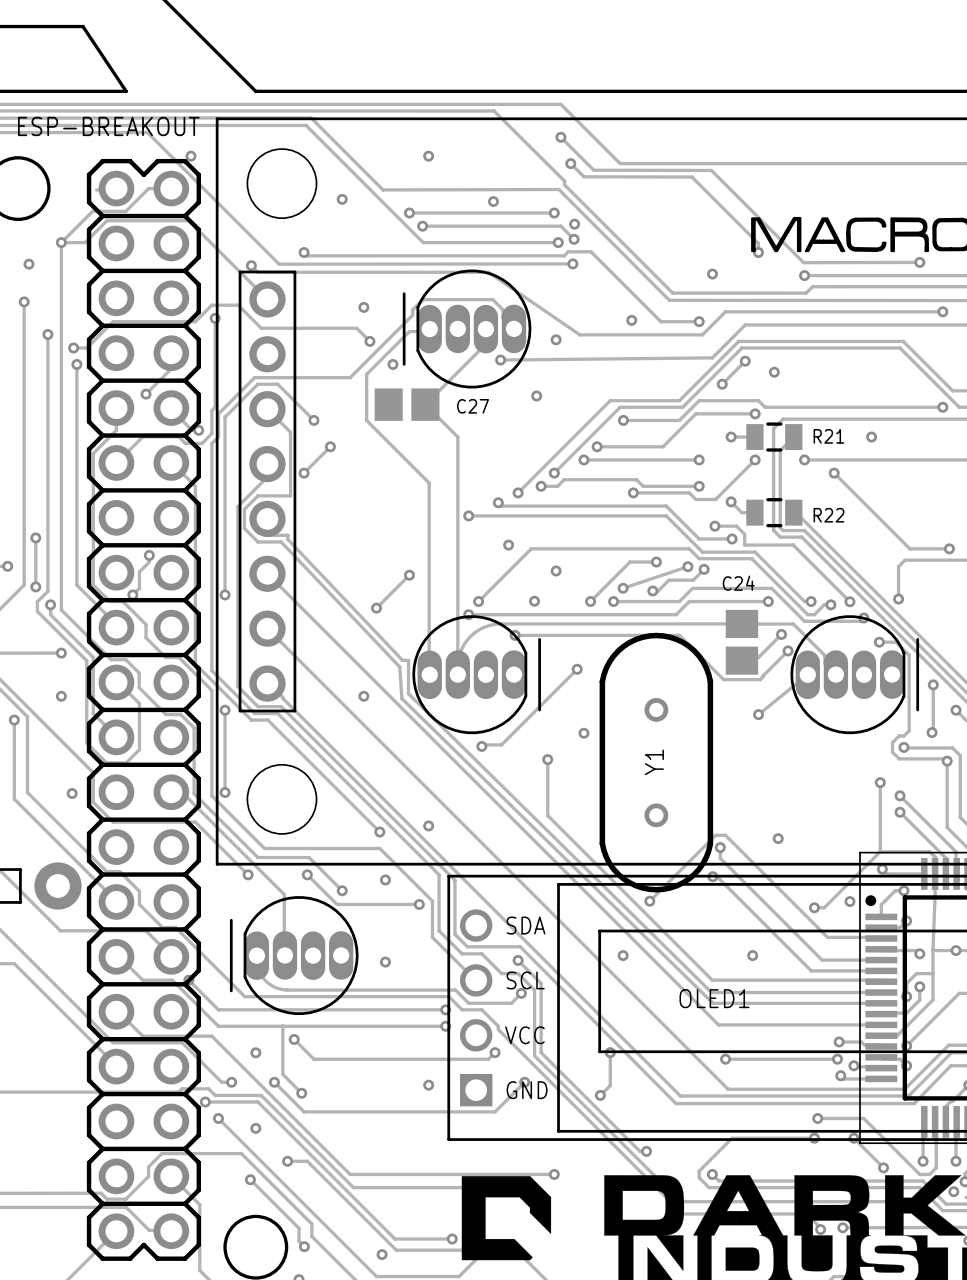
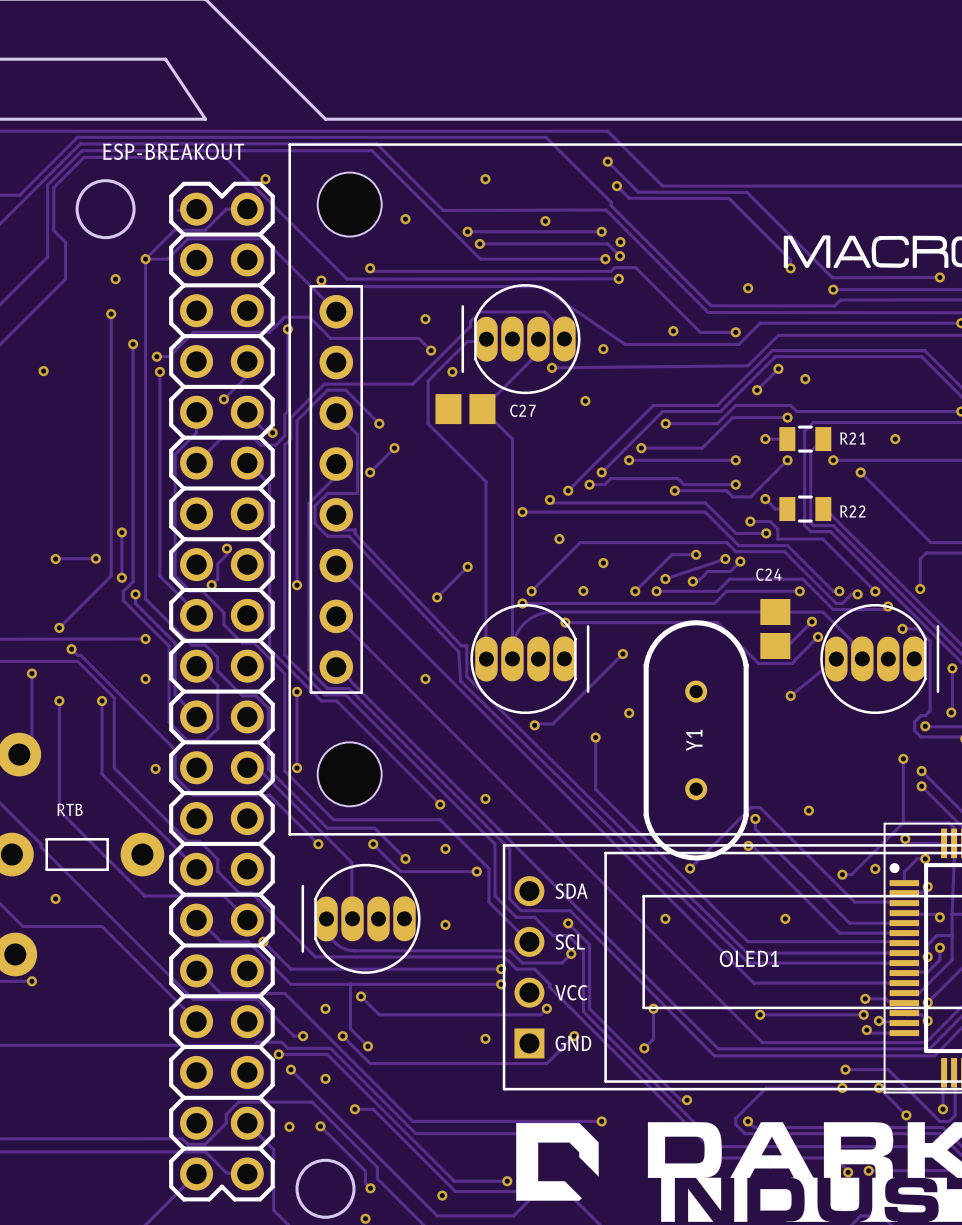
via: none -> (289, 1126)

